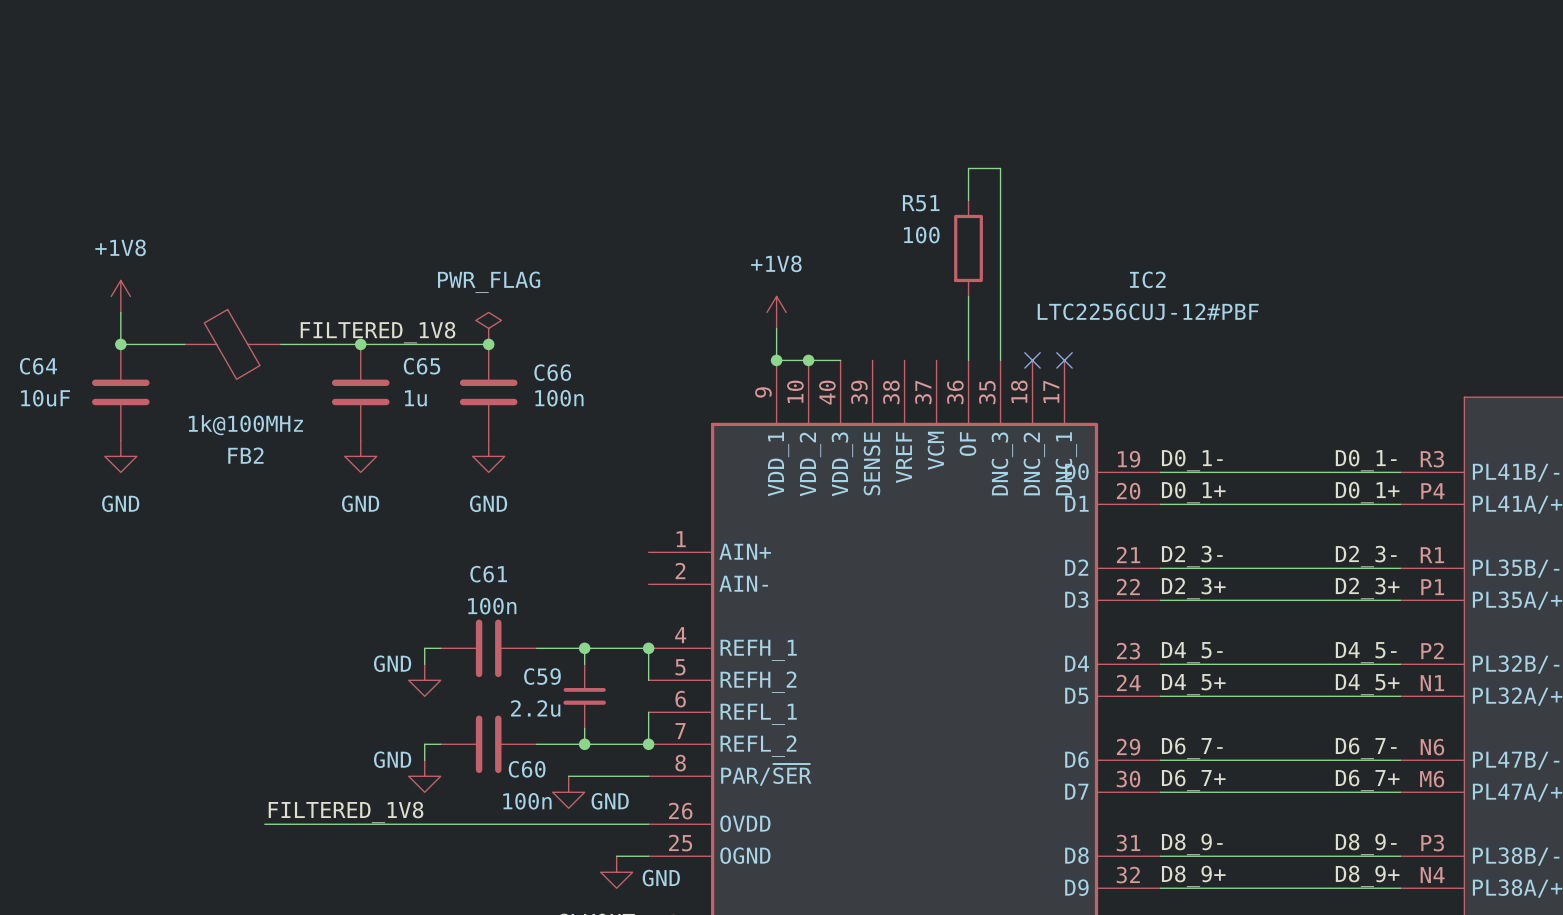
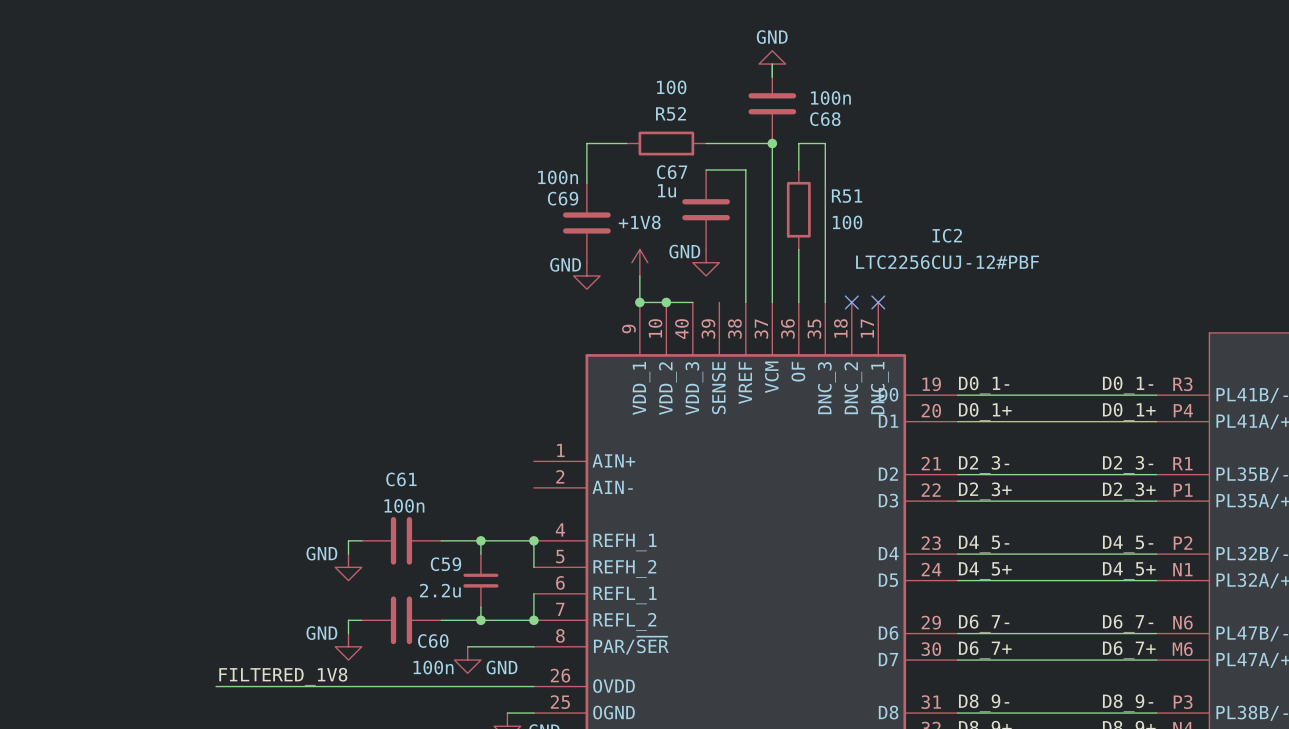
wire: none -> (772, 64) (772, 77)
power symbol: none -> GND (772, 64)
C68: none -> 100n (772, 103)
wire: none -> (626, 143) (586, 143) (586, 183)
R52: none -> 100 (666, 143)
wire: none -> (706, 143) (772, 143) (772, 302)
junction: none -> (772, 143)
wire: none -> (706, 170) (745, 170) (745, 302)
R51 name position: R51 (921, 203) -> R51 (847, 196)
R51 value position: 100 (921, 235) -> 100 (847, 222)
C67: none -> 1u (706, 209)
C69: none -> 100n (586, 222)
power symbol: +1V8 (120, 296) -> none
wire: (120, 312) (120, 344) (184, 344) -> none
power symbol: none -> GND (706, 262)
power symbol: PWR_FLAG (488, 328) -> none
power symbol: none -> GND (586, 275)
label: FILTERED_1V8 (378, 332) -> none
junction: (120, 344) -> none
FB2: 1k@100MHz (232, 344) -> none
wire: (280, 344) (488, 344) -> none
junction: (360, 344) -> none
junction: (488, 344) -> none
C64: 10uF (120, 392) -> none
C65: 1u (360, 392) -> none
C66: 100n (488, 392) -> none
power symbol: GND (120, 456) -> none
power symbol: GND (360, 456) -> none
power symbol: GND (488, 456) -> none

